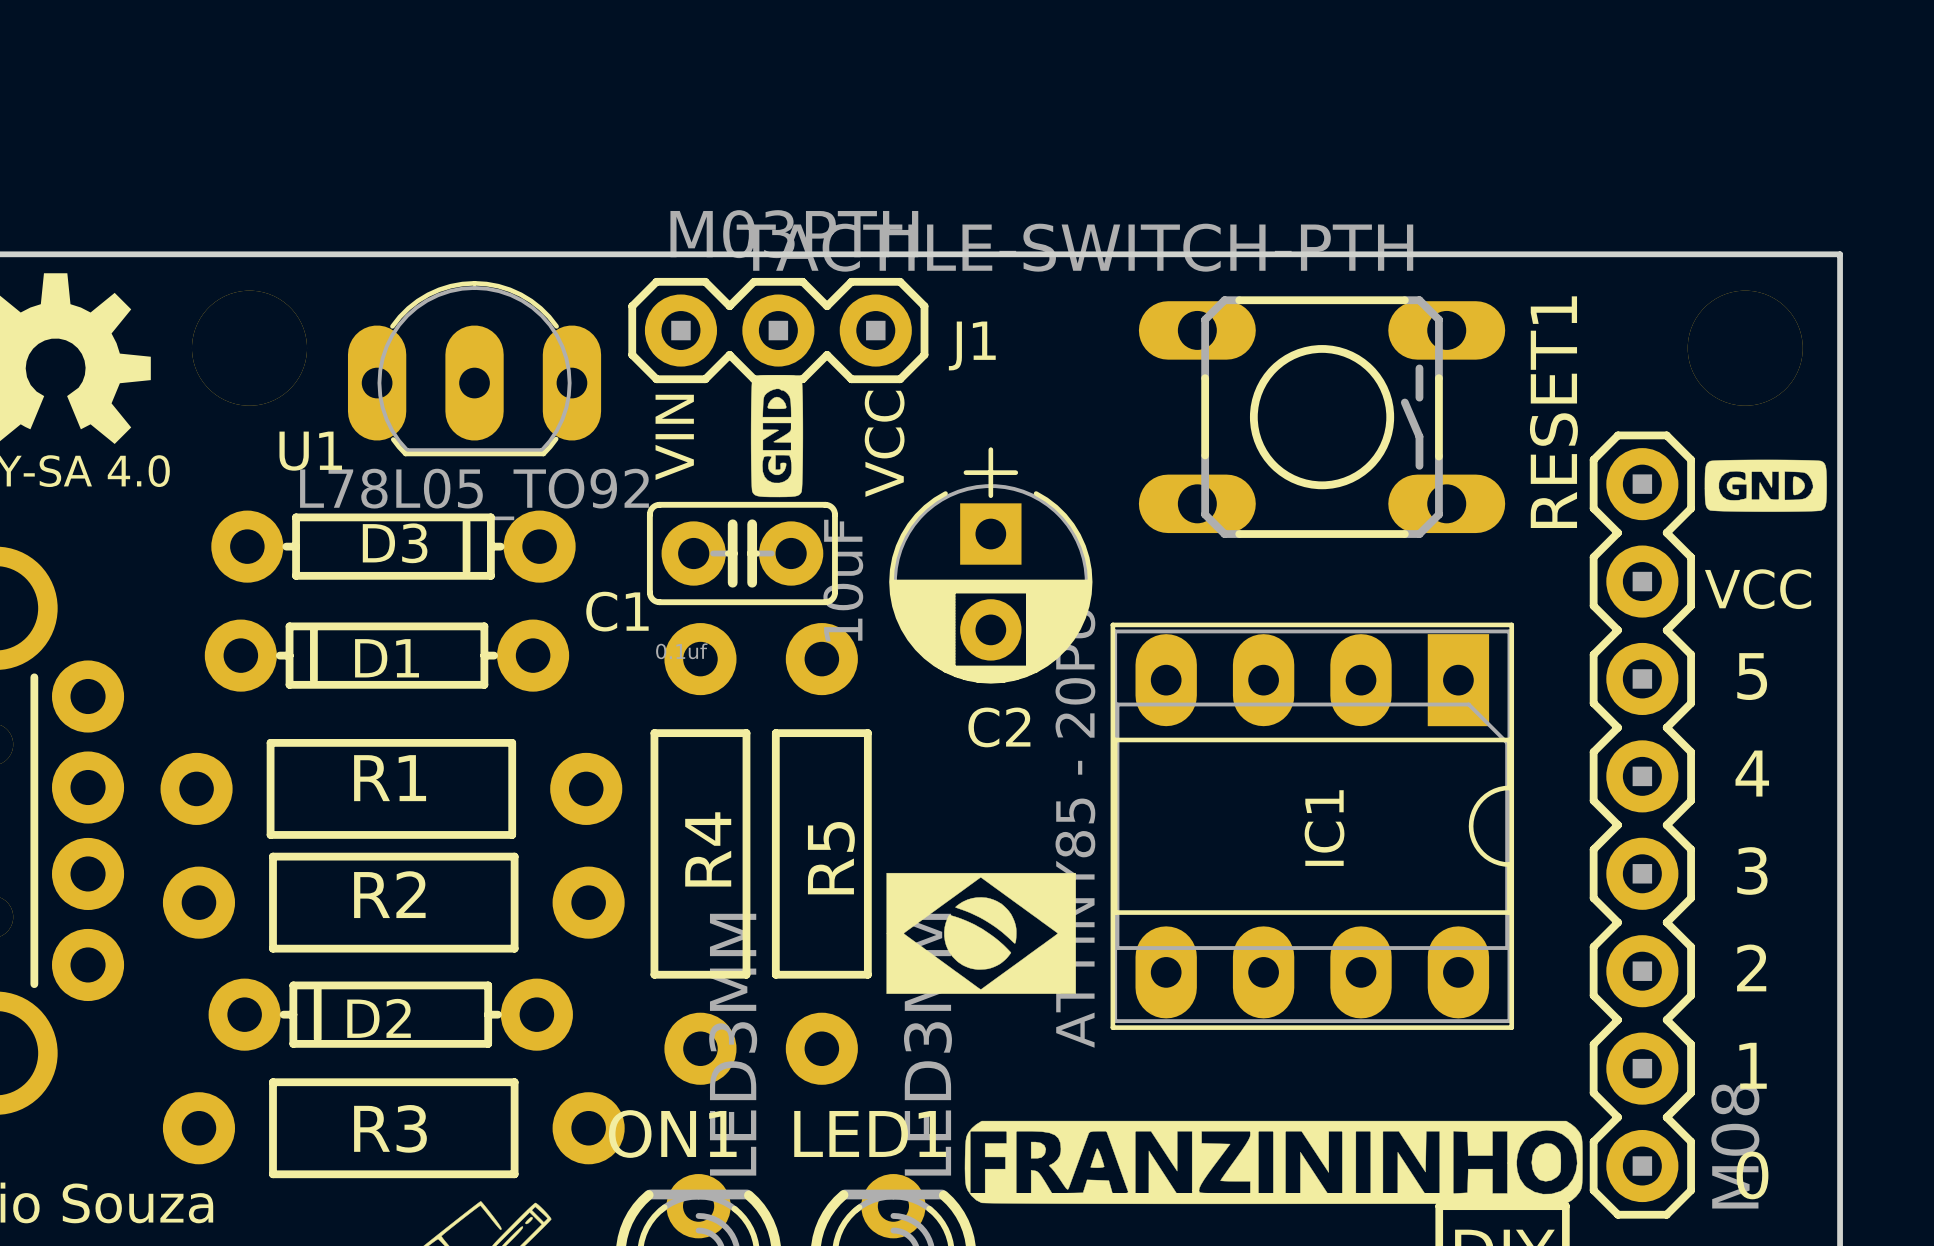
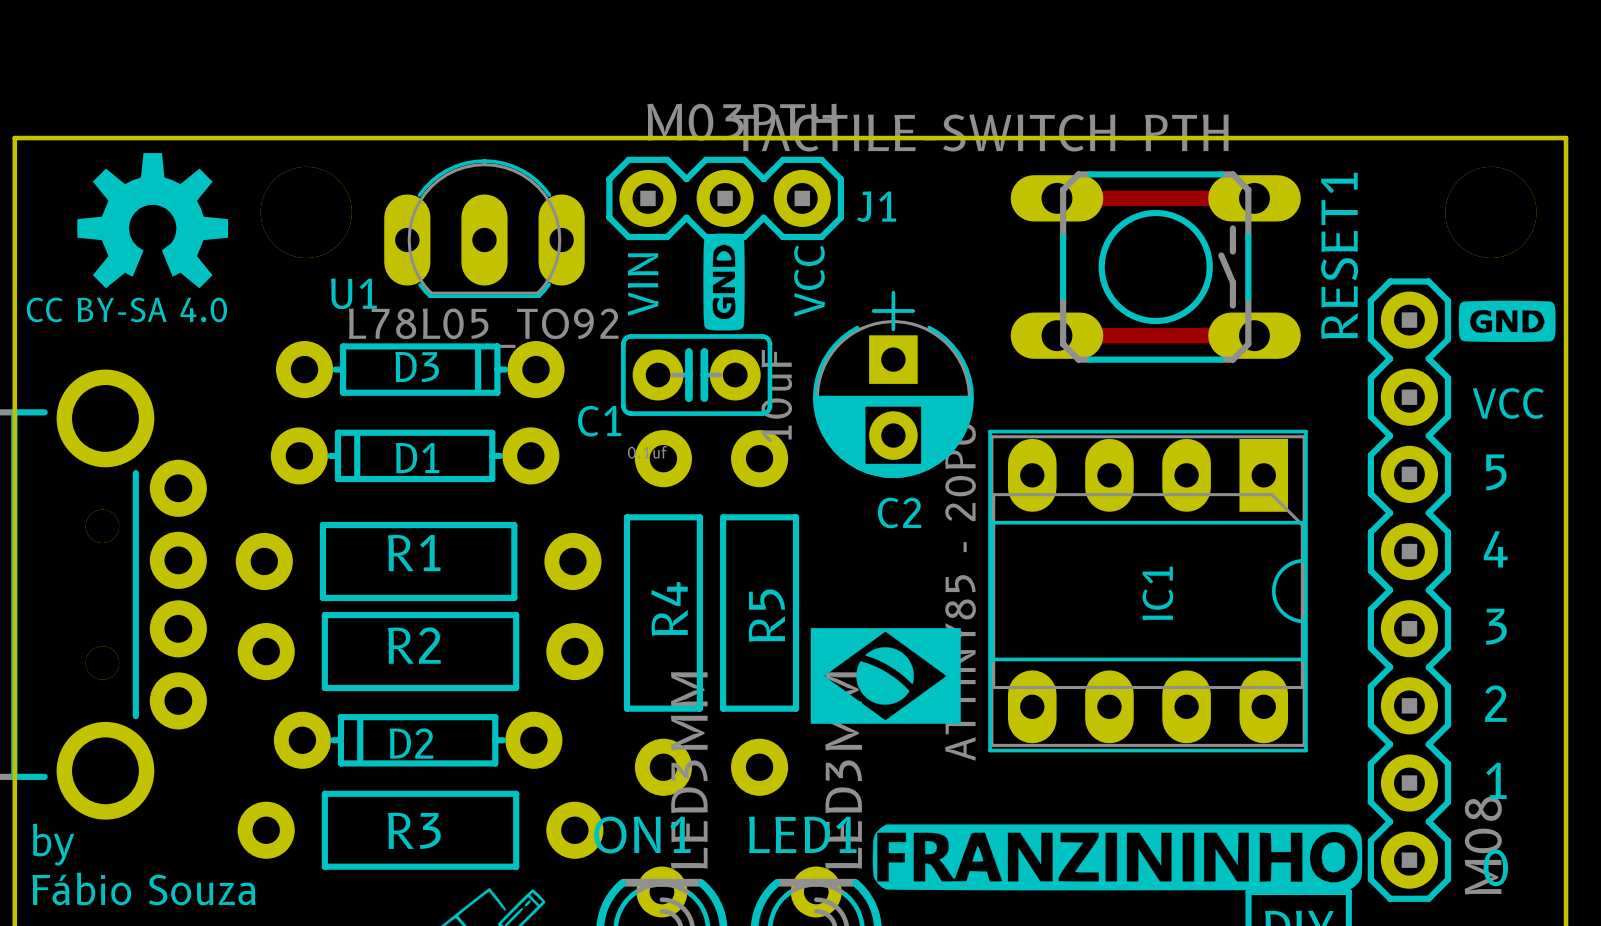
track: none -> (1056, 198) (1254, 198)
track: none -> (1056, 335) (1254, 335)

